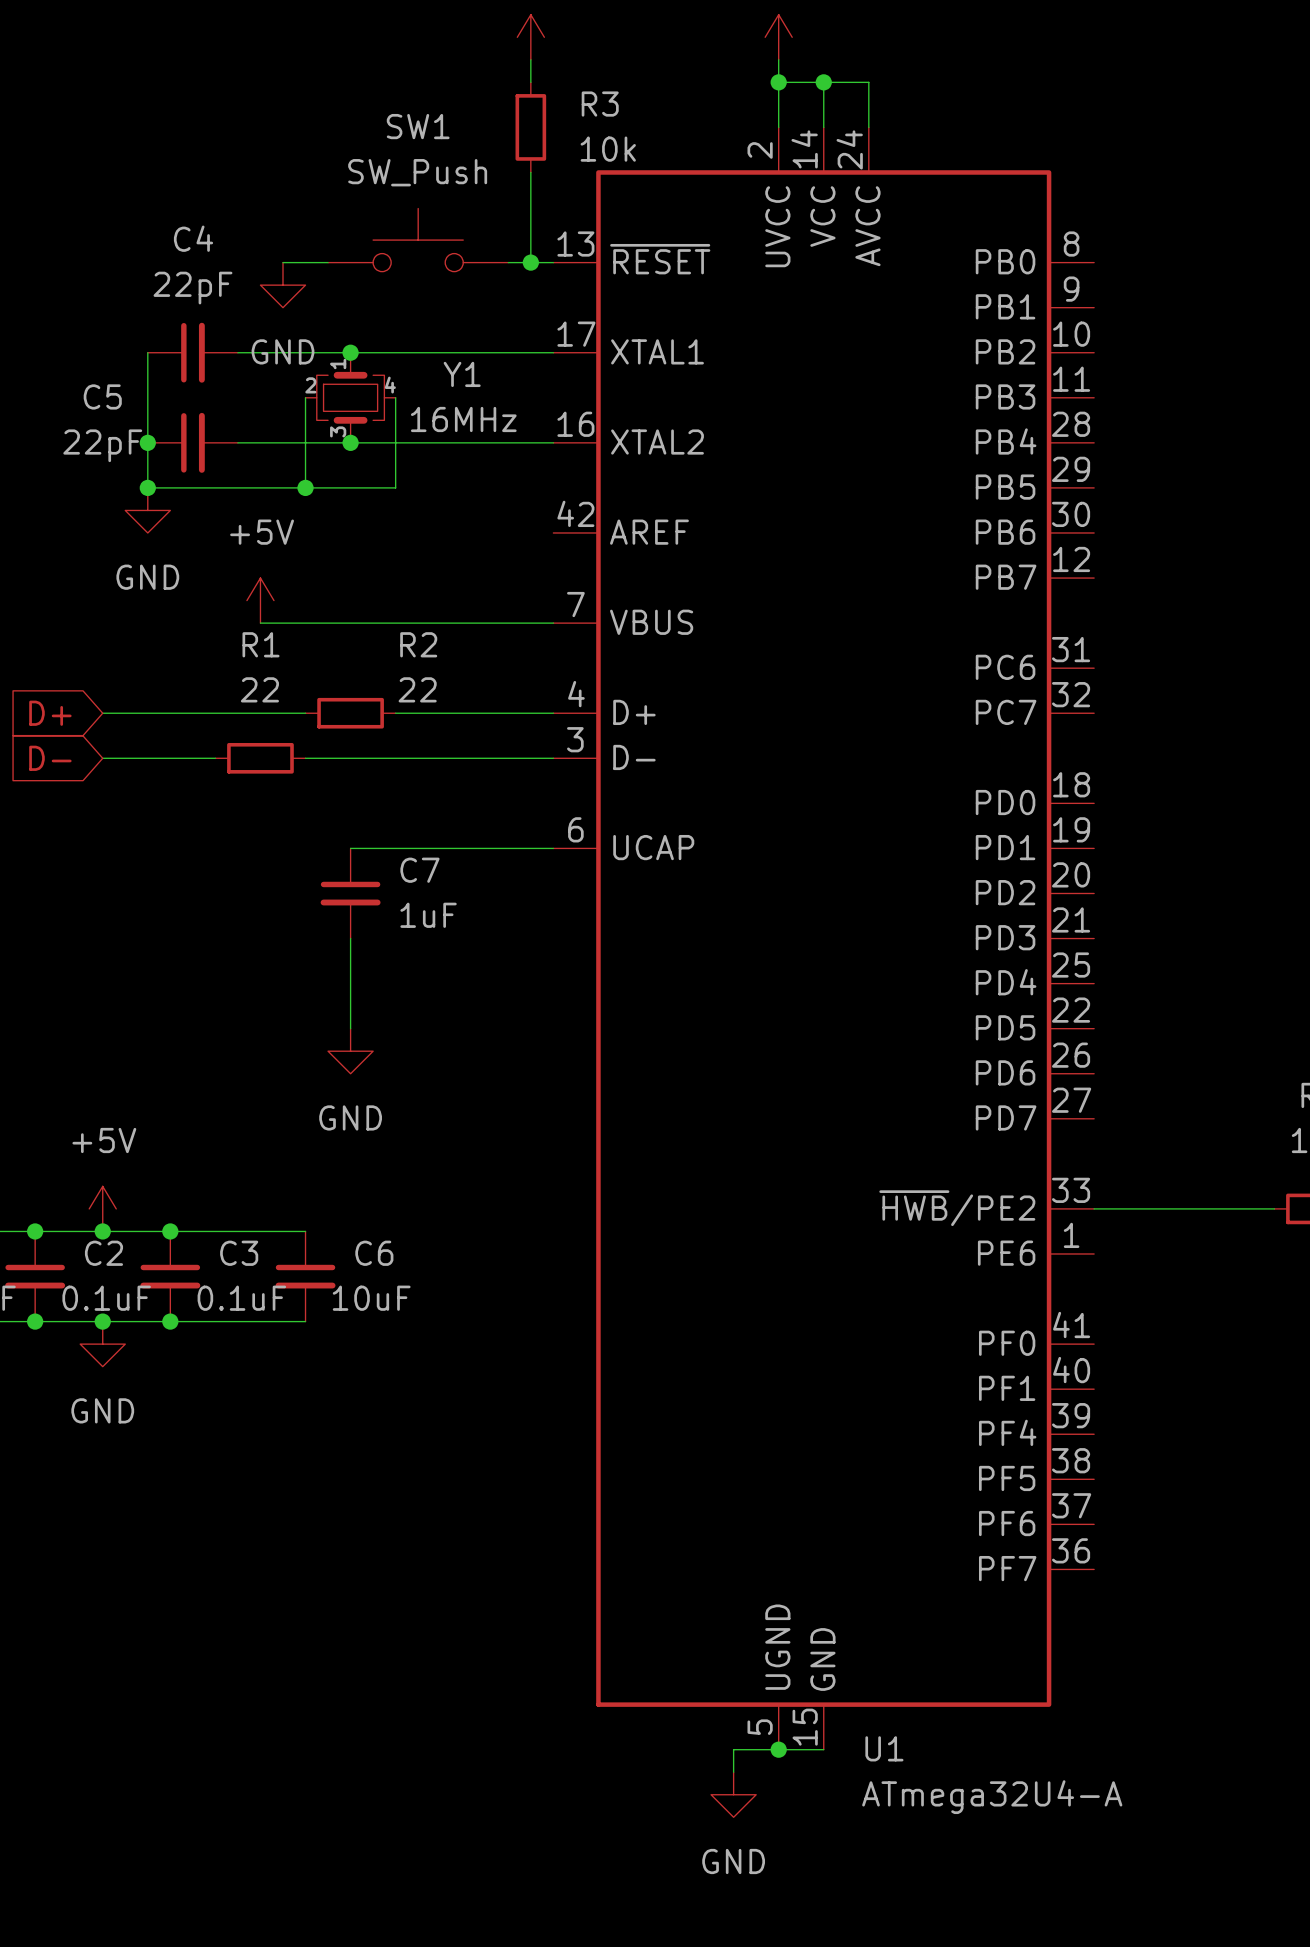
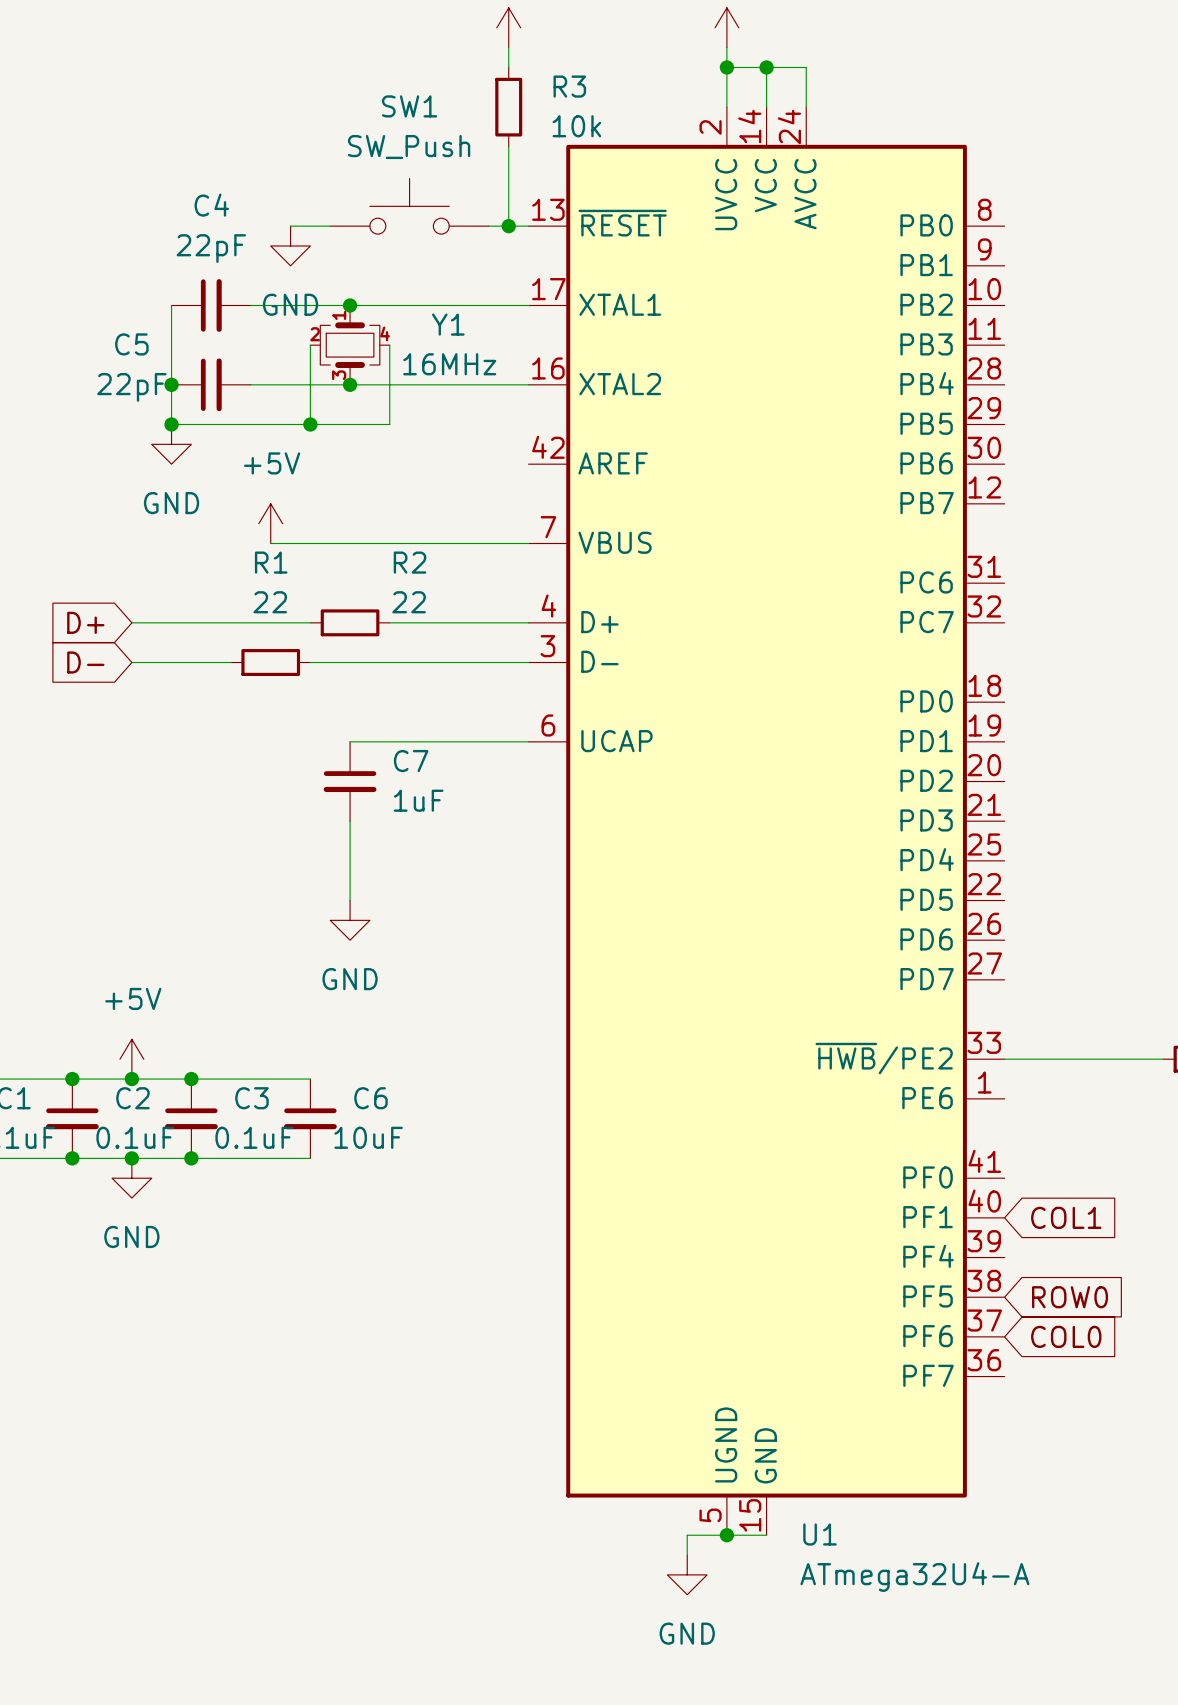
global label: none -> COL1 (1066, 1217)
global label: none -> ROW0 (1070, 1297)
global label: none -> COL0 (1066, 1336)

